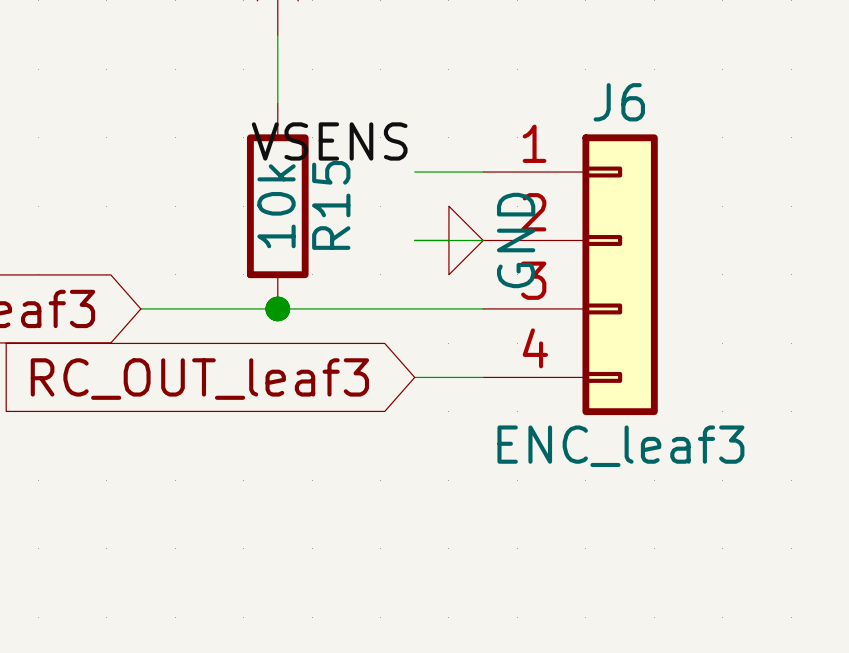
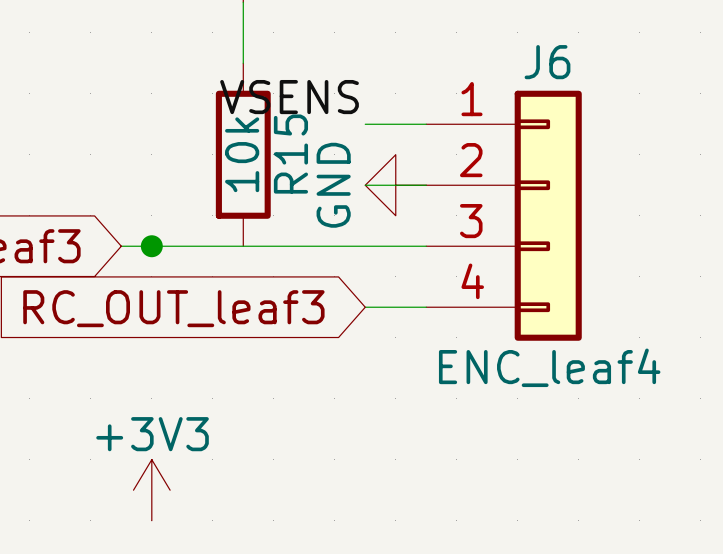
power symbol rotation: 0° (448, 240) -> 180° (395, 185)
junction position: (277, 308) -> (151, 246)
J6 value: ENC_leaf3 (620, 446) -> ENC_leaf4 (549, 367)
power symbol: none -> +3V3 (151, 490)

